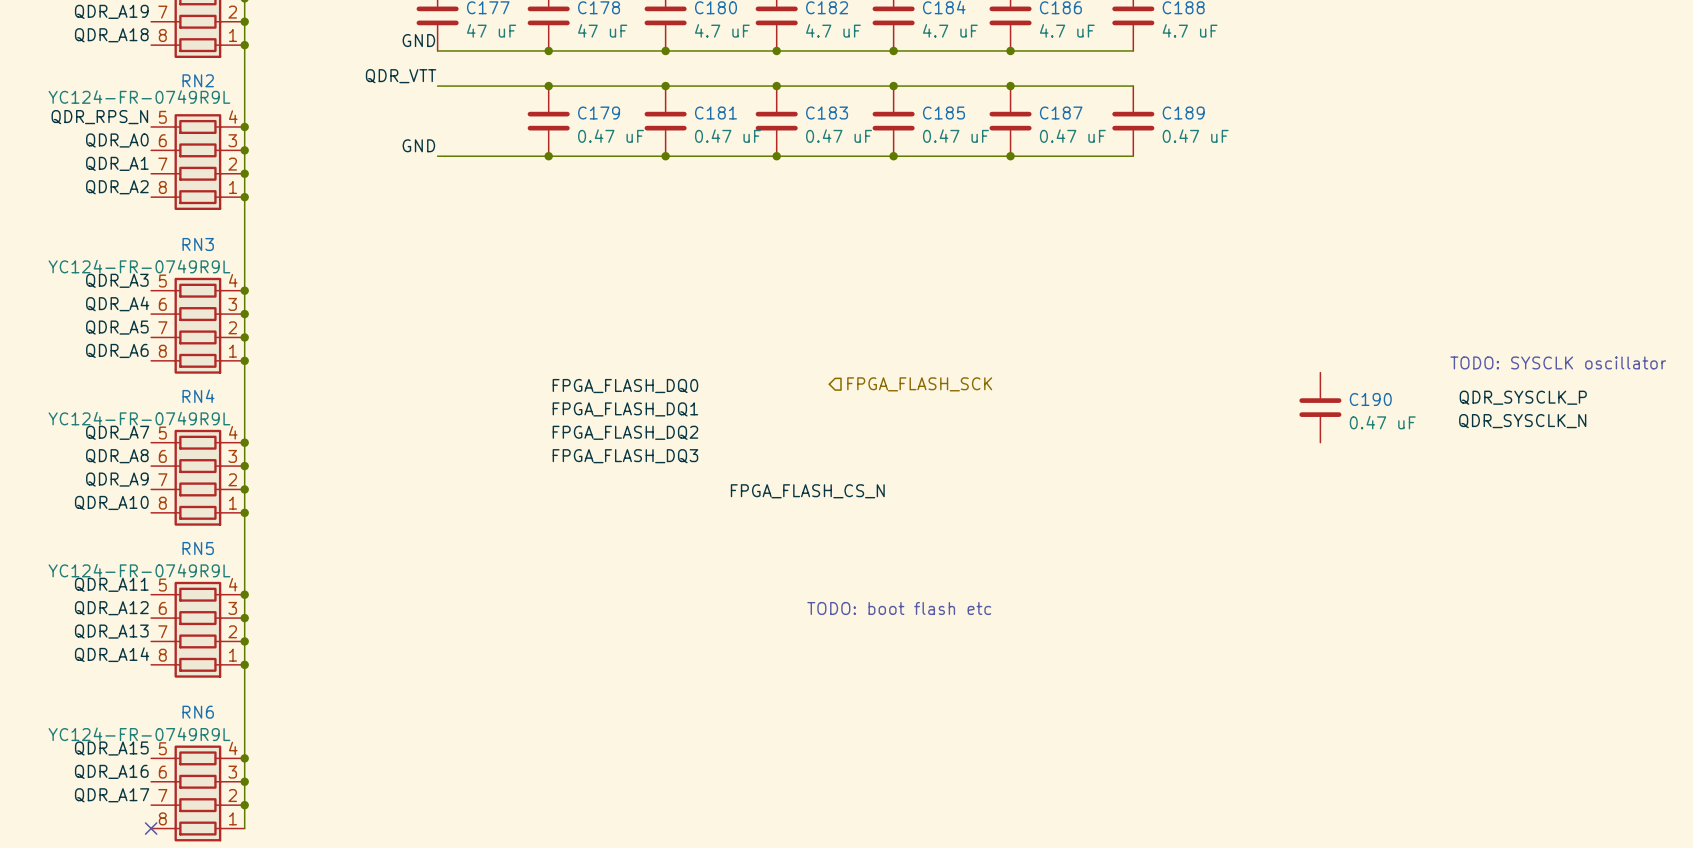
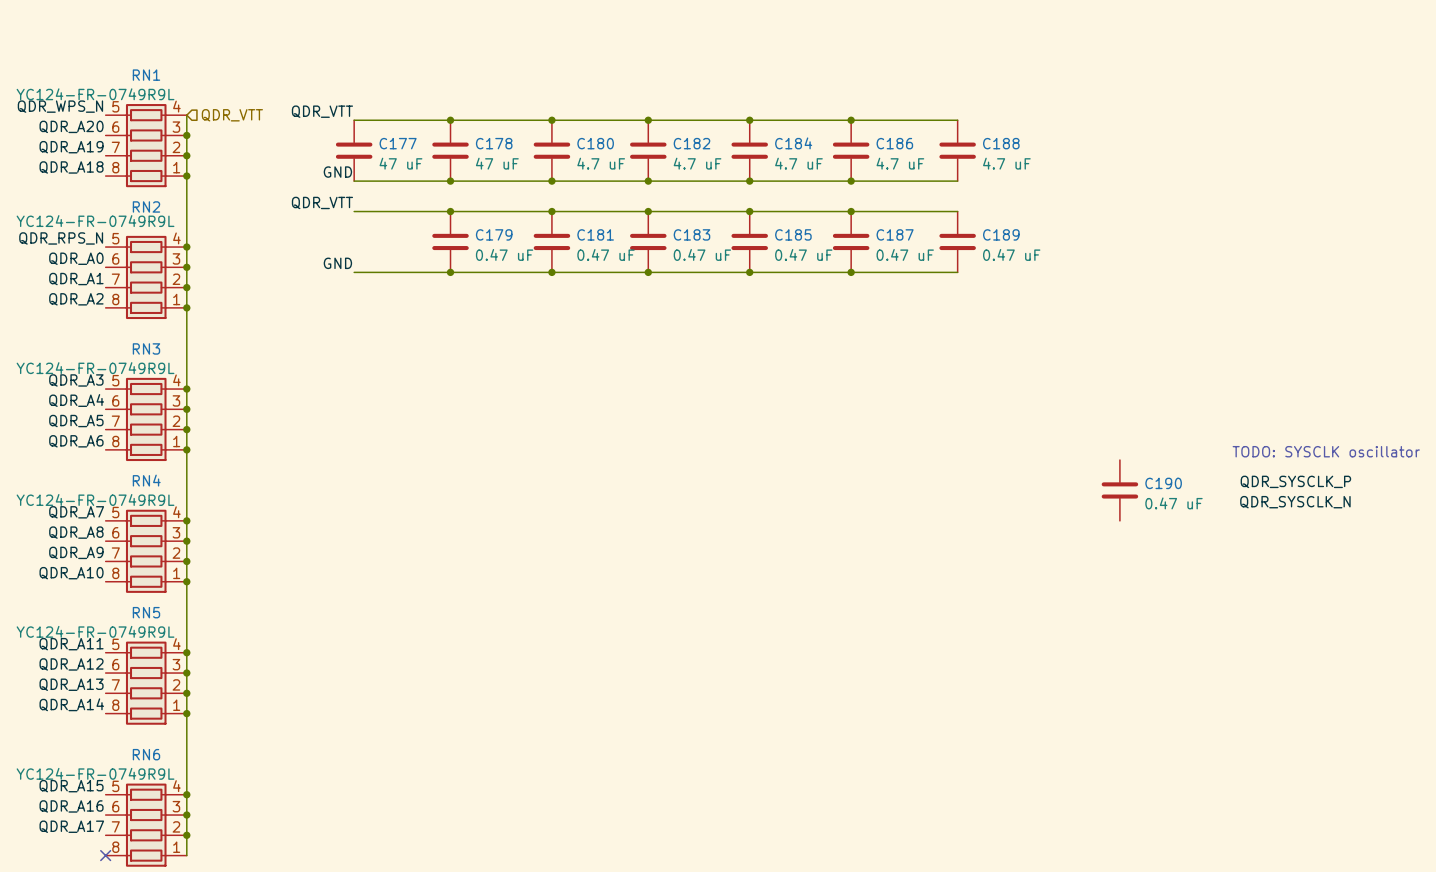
hierarchical label: FPGA_FLASH_SCK (919, 384) -> none
label: FPGA_FLASH_DQ0 (625, 386) -> none
label: FPGA_FLASH_DQ1 (625, 409) -> none
label: FPGA_FLASH_DQ2 (625, 432) -> none
label: FPGA_FLASH_DQ3 (625, 456) -> none
label: FPGA_FLASH_CS_N (807, 491) -> none
text: TODO: boot flash etc (899, 608) -> none

